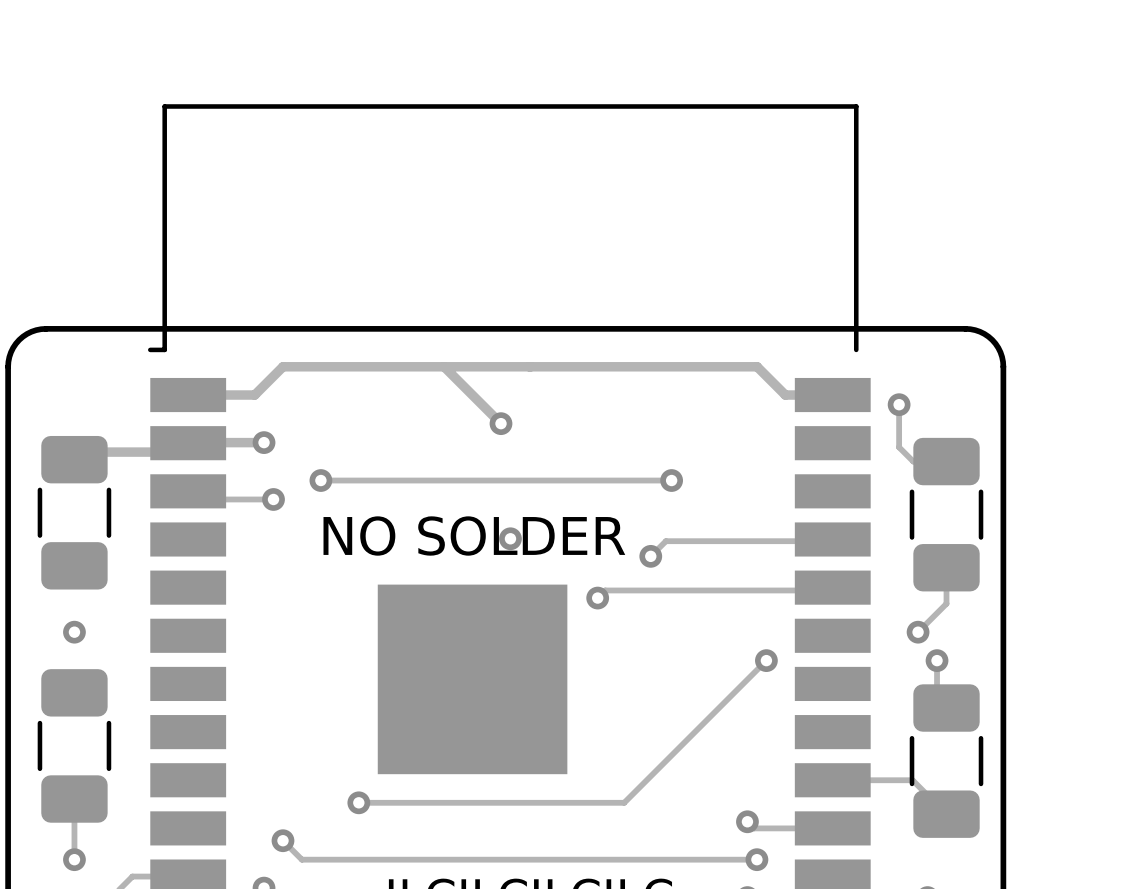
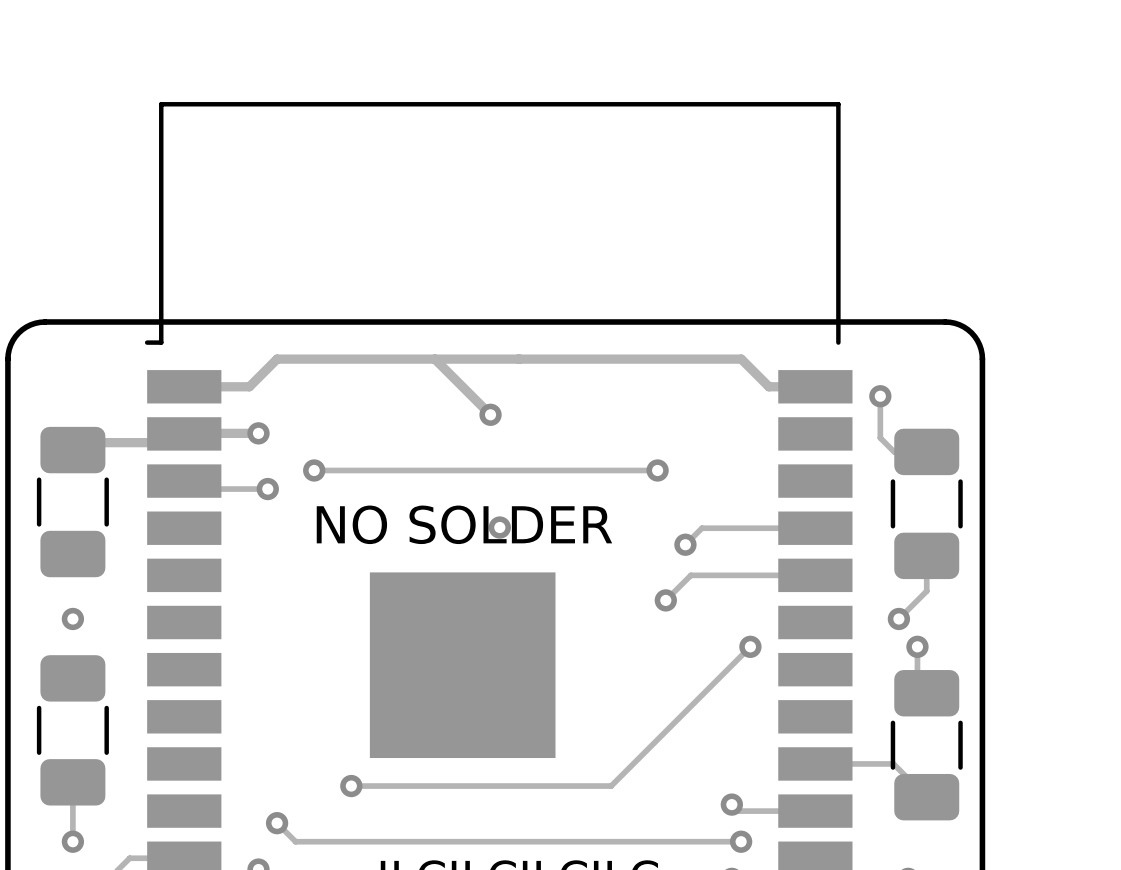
track: (832, 539) (831, 541) (665, 541) (650, 556) -> (815, 528) (701, 528) (685, 544)
via: (650, 556) -> none
via: none -> (685, 544)
track: (832, 587) (829, 590) (605, 590) (597, 598) -> (815, 575) (690, 575) (665, 600)
via: (597, 598) -> none
via: none -> (665, 600)

